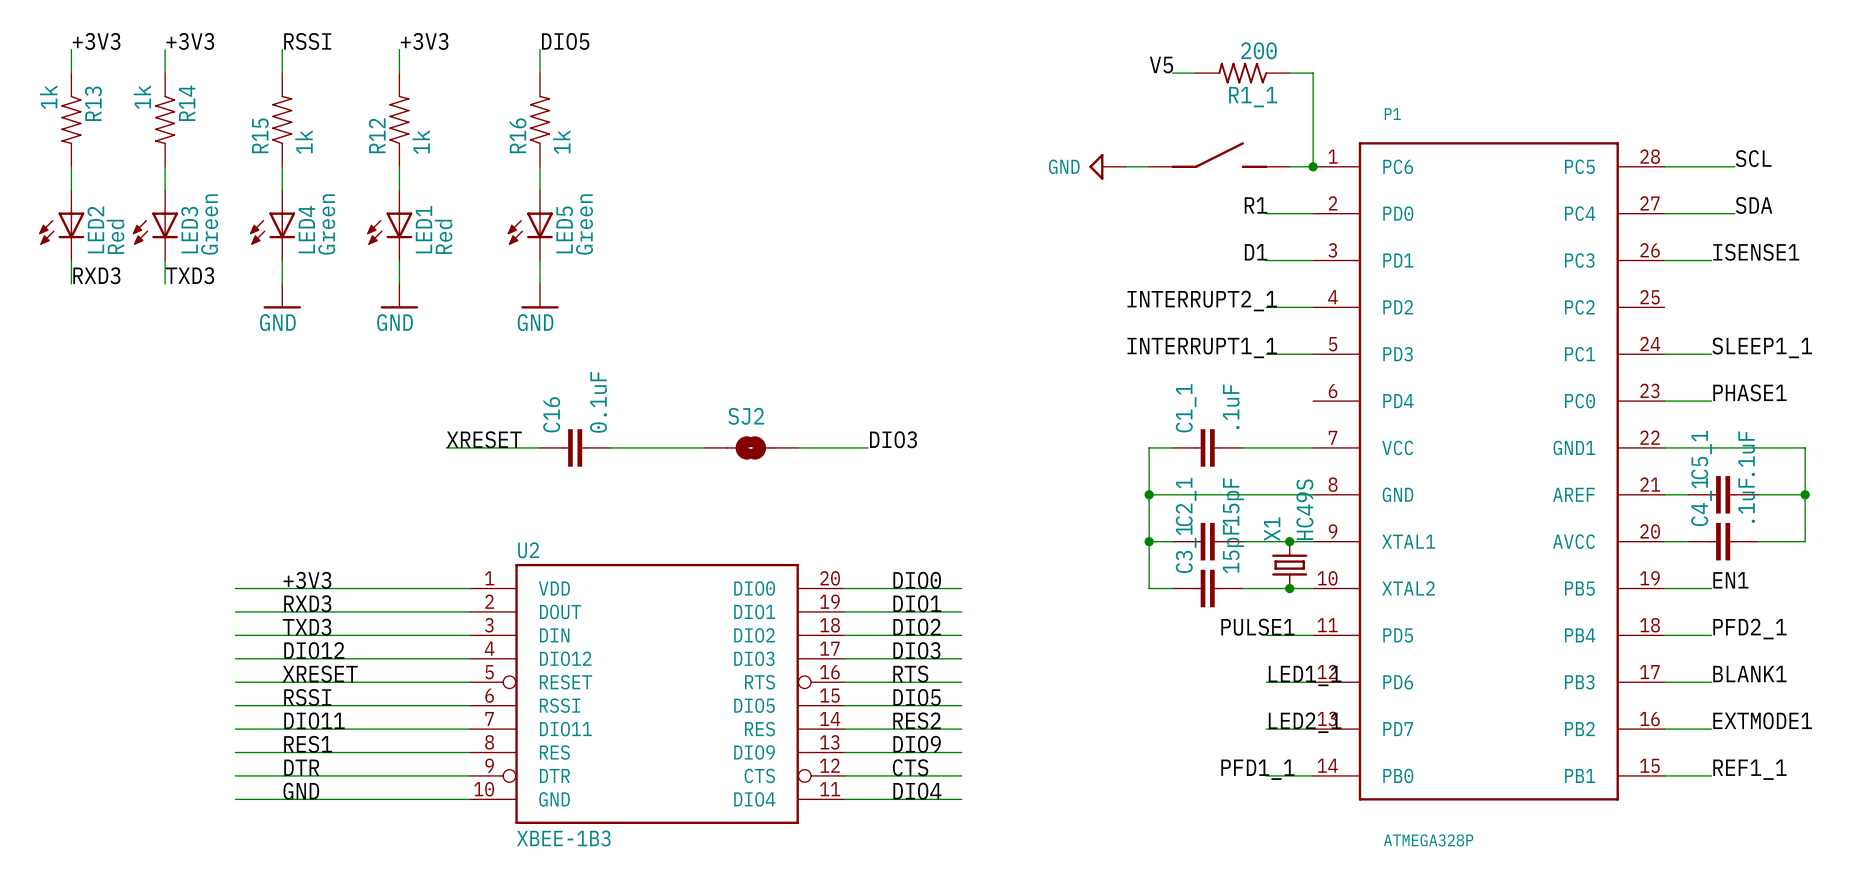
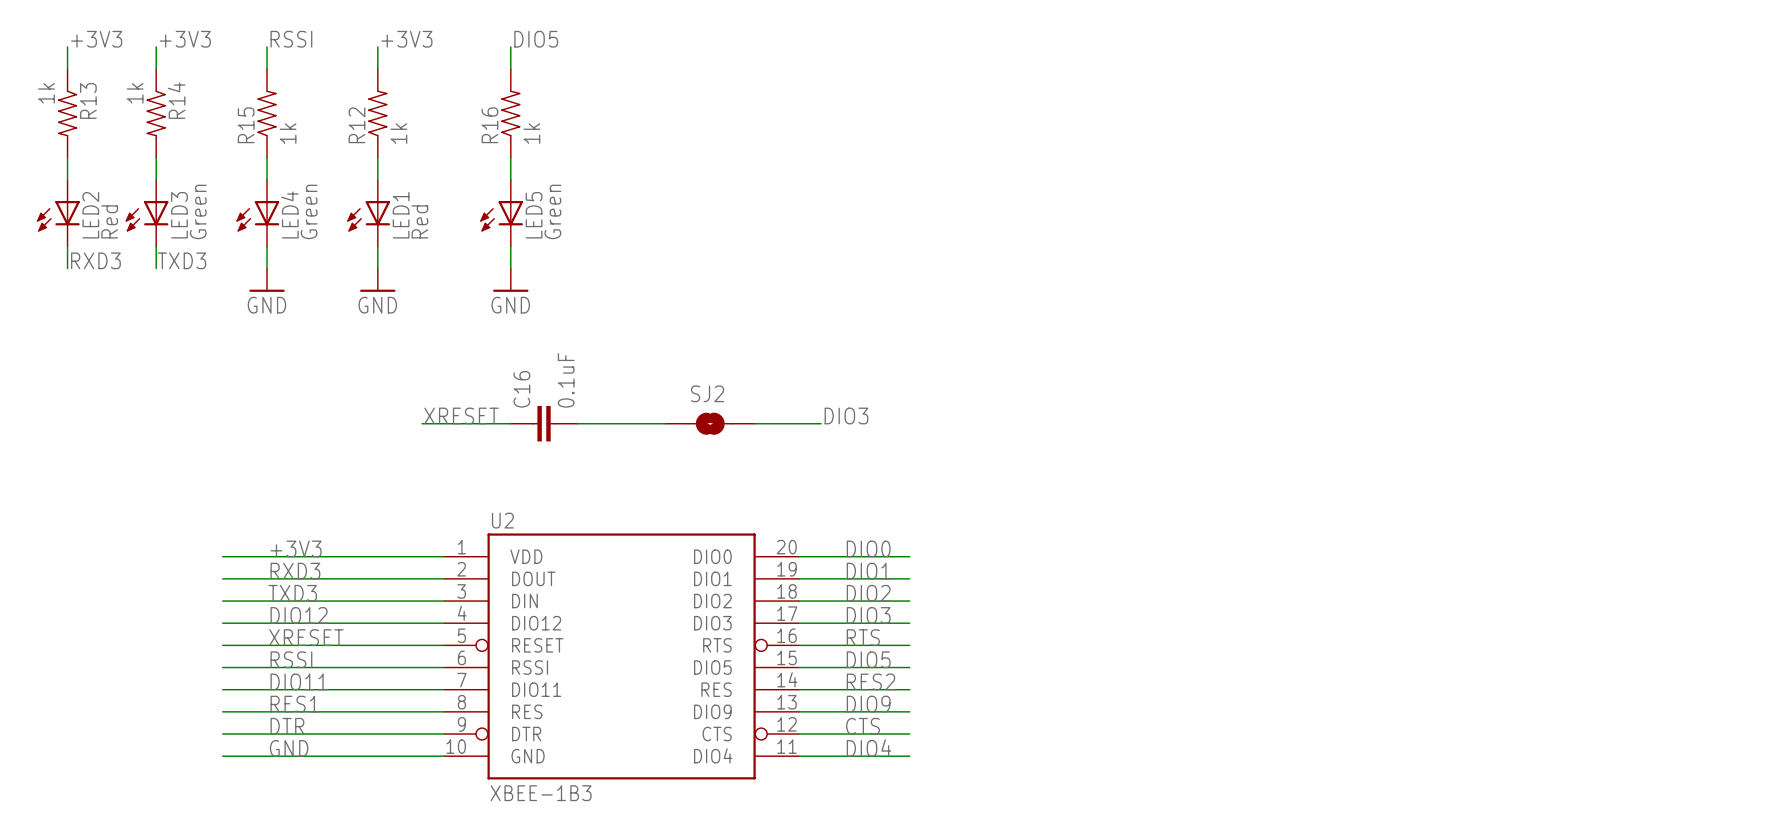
label: V5 (1161, 65) -> none
wire: (1172, 73) (1195, 73) -> none
R1_1: 200 (1242, 73) -> none
wire: (1289, 73) (1313, 73) (1313, 166) (1289, 166) -> none
part: (1219, 155) -> none
label: SCL (1753, 158) -> none
power symbol: (1107, 166) -> none
wire: (1125, 166) (1149, 166) -> none
junction: (1313, 166) -> none
wire: (1664, 166) (1734, 166) -> none
label: R1 (1255, 205) -> none
label: SDA (1754, 205) -> none
wire: (1266, 213) (1313, 213) -> none
wire: (1664, 213) (1734, 213) -> none
label: D1 (1256, 252) -> none
label: ISENSE1 (1756, 252) -> none
wire: (1266, 260) (1313, 260) -> none
wire: (1664, 260) (1711, 260) -> none
label: INTERRUPT2_1 (1202, 301) -> none
wire: (1266, 307) (1313, 307) -> none
label: SLEEP1_1 (1762, 347) -> none
label: INTERRUPT1_1 (1202, 348) -> none
wire: (1266, 354) (1313, 354) -> none
wire: (1664, 354) (1711, 354) -> none
label: PHASE1 (1749, 392) -> none
wire: (1664, 401) (1711, 401) -> none
wire: (1172, 447) (1149, 447) (1149, 588) (1172, 588) -> none
C1_1: .1uF (1207, 447) -> none
wire: (1242, 447) (1313, 447) -> none
wire: (1664, 447) (1805, 447) (1805, 541) (1758, 541) -> none
P1: ATMEGA328P (1488, 471) -> none
wire: (1149, 494) (1313, 494) -> none
junction: (1149, 494) -> none
wire: (1664, 494) (1687, 494) -> none
C5_1: .1uF (1723, 494) -> none
wire: (1758, 494) (1805, 494) -> none
junction: (1805, 494) -> none
wire: (1149, 541) (1172, 541) -> none
junction: (1149, 541) -> none
C2_1: 15pF (1207, 541) -> none
wire: (1242, 541) (1313, 541) -> none
junction: (1289, 541) -> none
wire: (1664, 541) (1687, 541) -> none
C4_1: .1uF (1723, 541) -> none
X1: HC49S (1289, 565) -> none
label: EN1 (1730, 580) -> none
C3_1: 15pF (1207, 588) -> none
wire: (1242, 588) (1313, 588) -> none
junction: (1289, 588) -> none
wire: (1664, 588) (1711, 588) -> none
label: PULSE1 (1257, 627) -> none
label: PFD2_1 (1749, 629) -> none
wire: (1266, 635) (1313, 635) -> none
wire: (1664, 635) (1711, 635) -> none
label: BLANK1 (1749, 674) -> none
label: LED1_1 (1305, 676) -> none
wire: (1266, 682) (1313, 682) -> none
wire: (1664, 682) (1711, 682) -> none
label: EXTMODE1 (1762, 720) -> none
label: LED2_1 (1305, 722) -> none
wire: (1266, 729) (1313, 729) -> none
wire: (1664, 729) (1711, 729) -> none
label: PFD1_1 (1257, 769) -> none
label: REF1_1 (1749, 769) -> none
wire: (1266, 775) (1313, 775) -> none
wire: (1664, 775) (1711, 775) -> none

